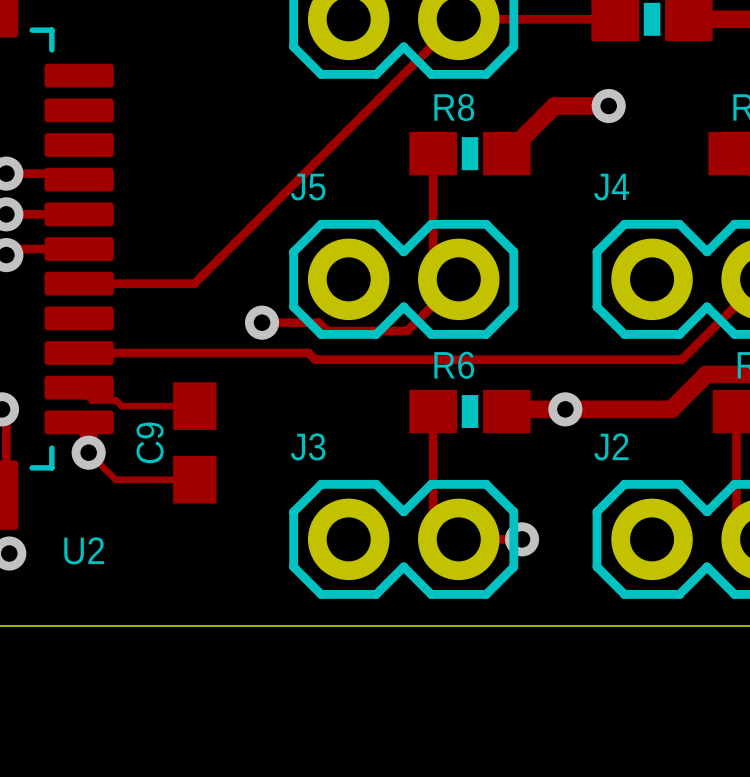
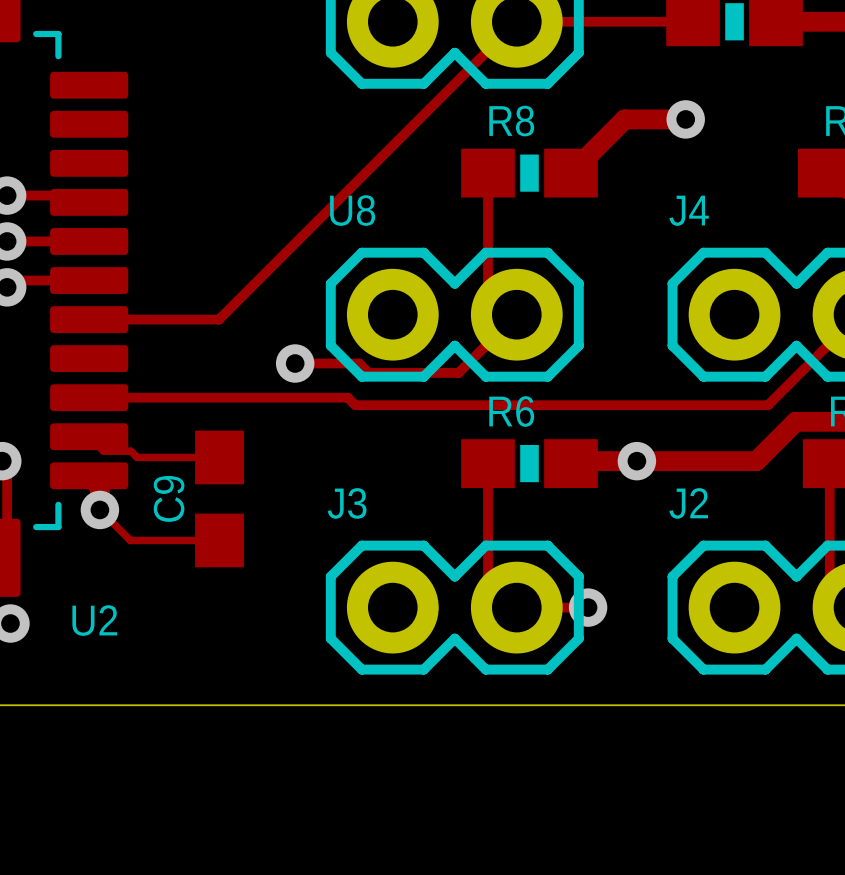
J5 name: J5 (308, 187) -> U8 (352, 210)

